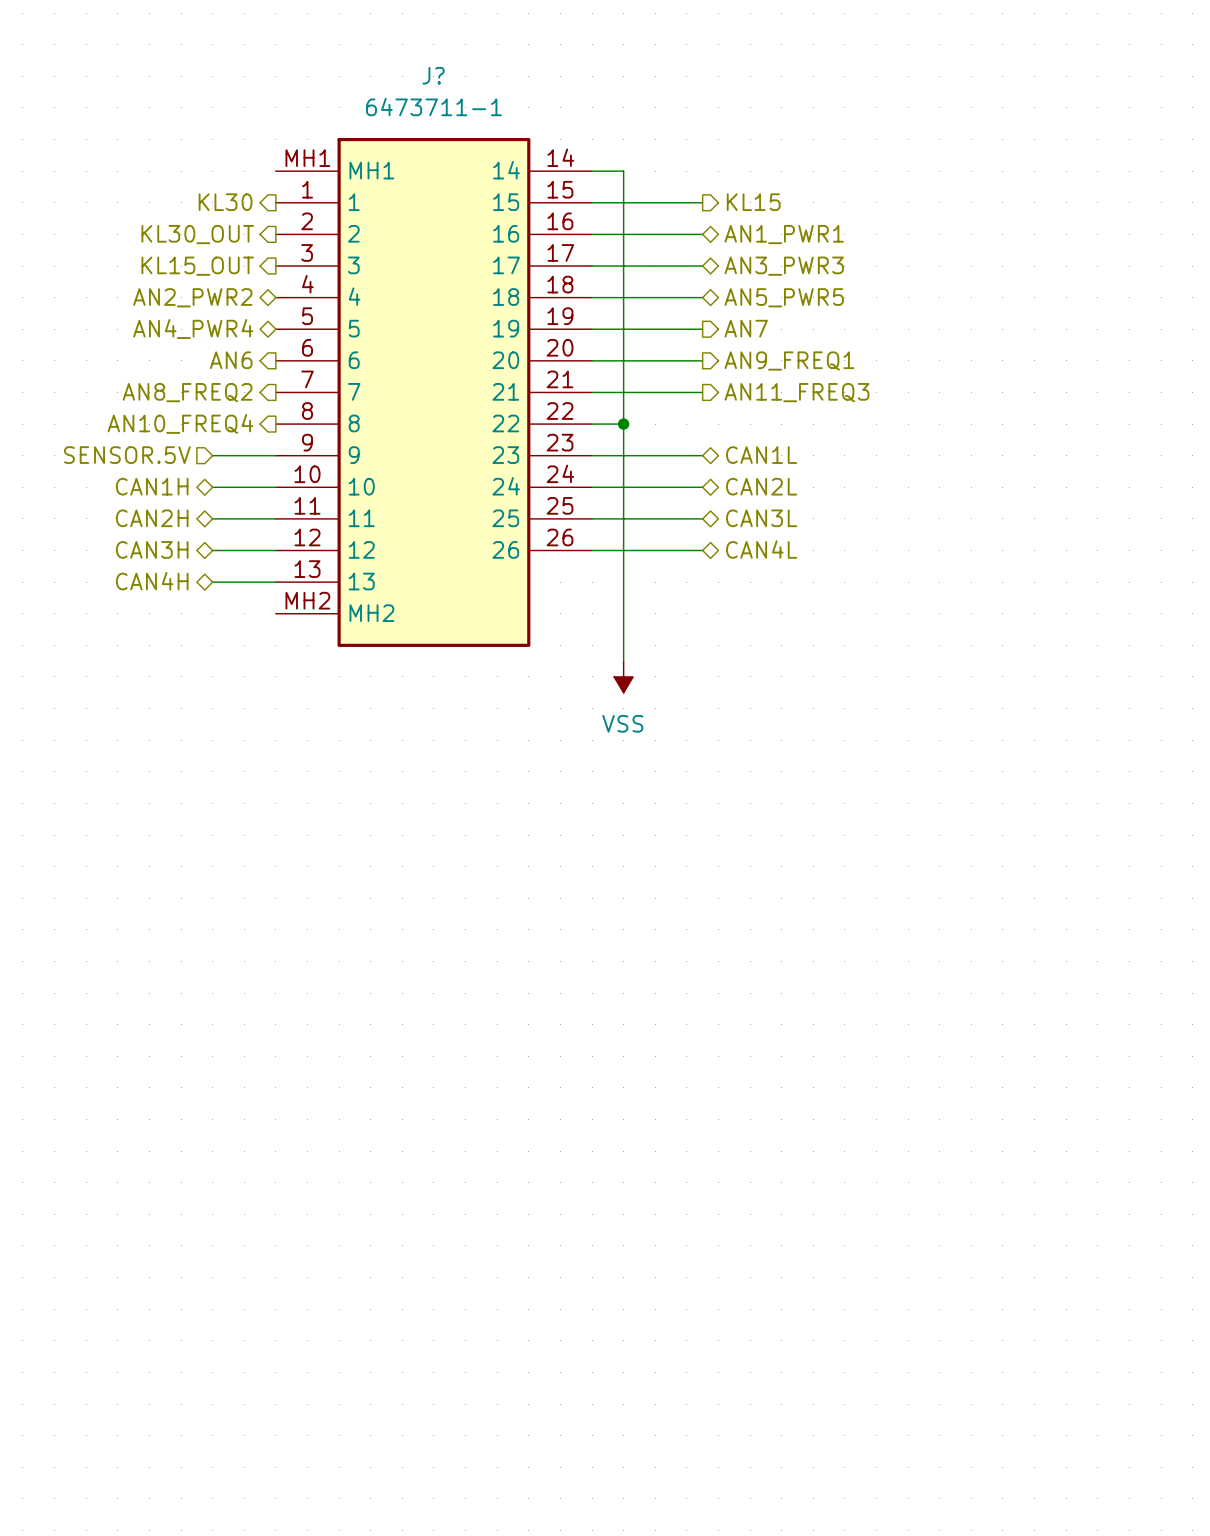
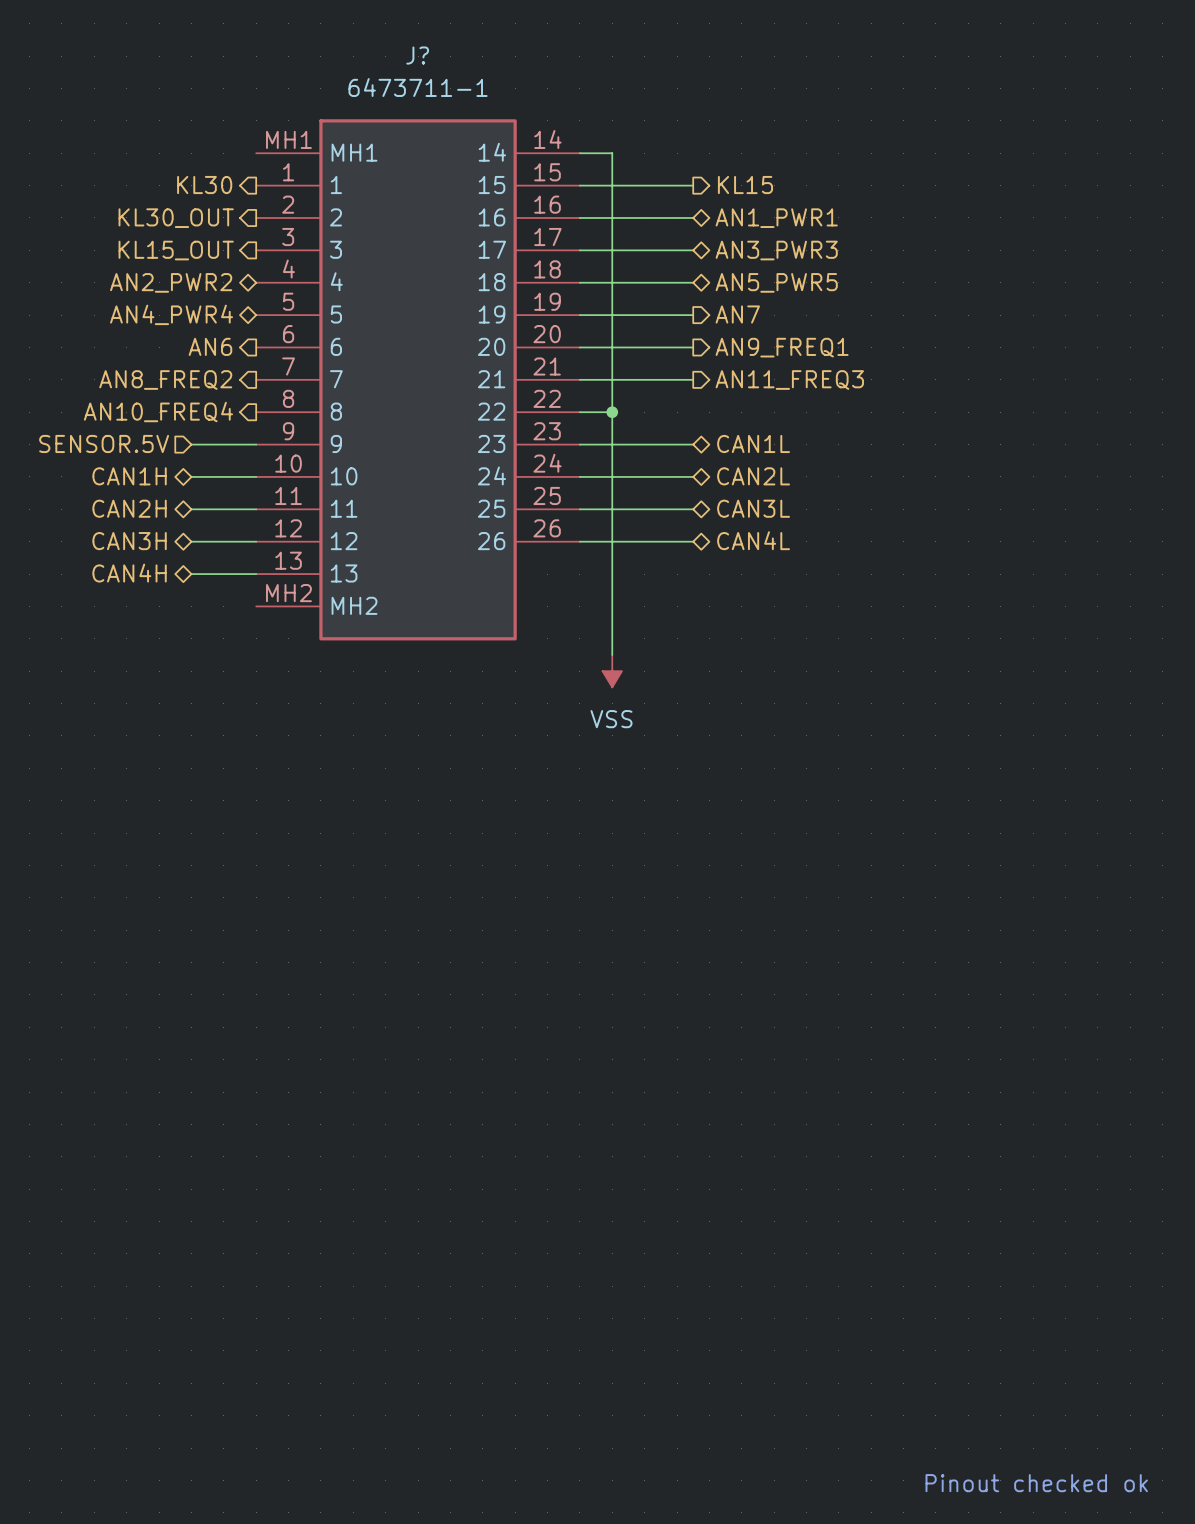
text: none -> Pinout checked ok (1036, 1483)

